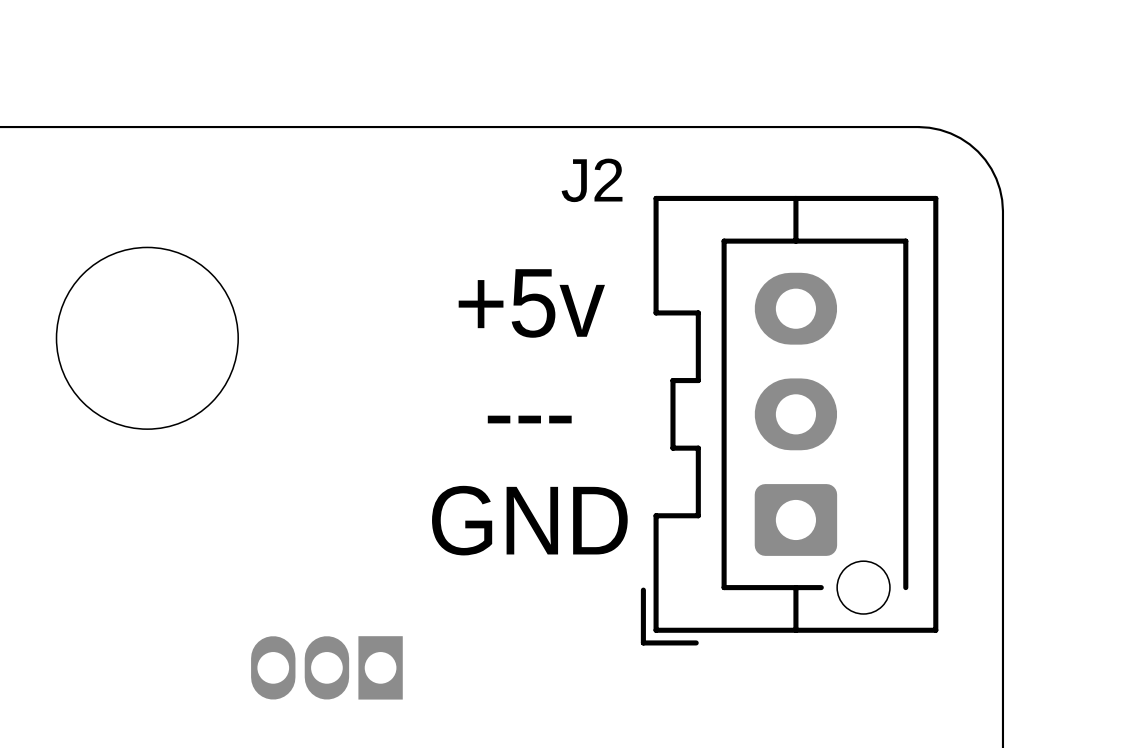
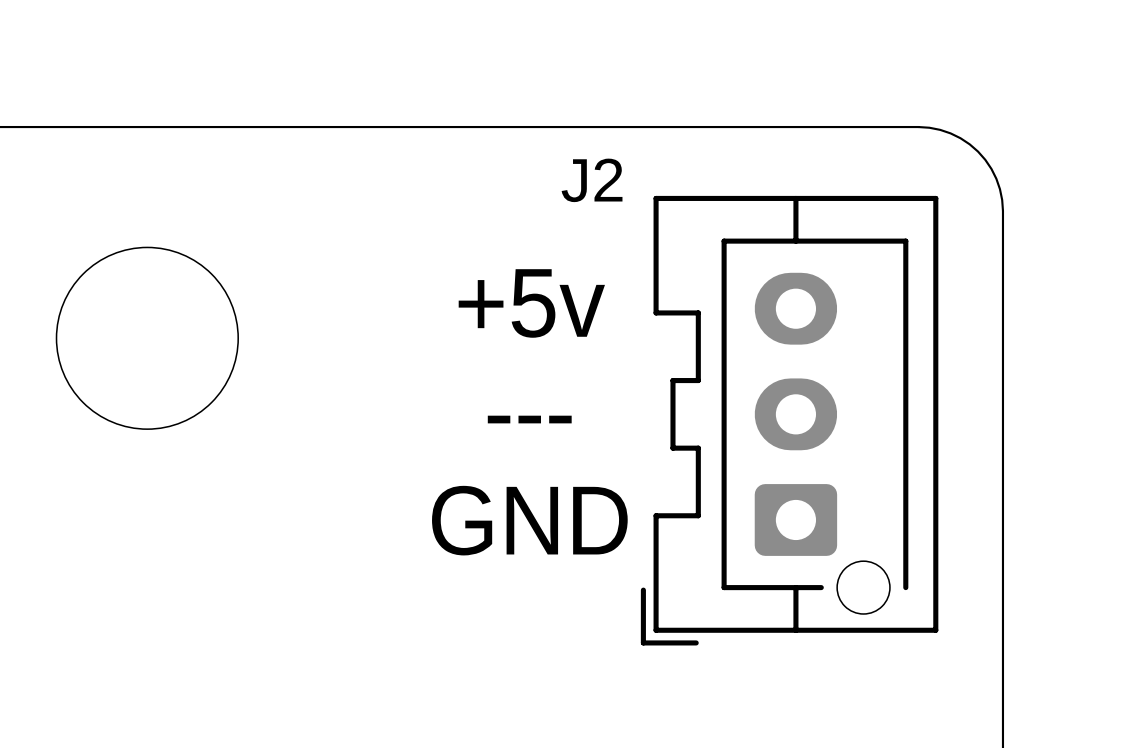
part: (326, 667) -> none

